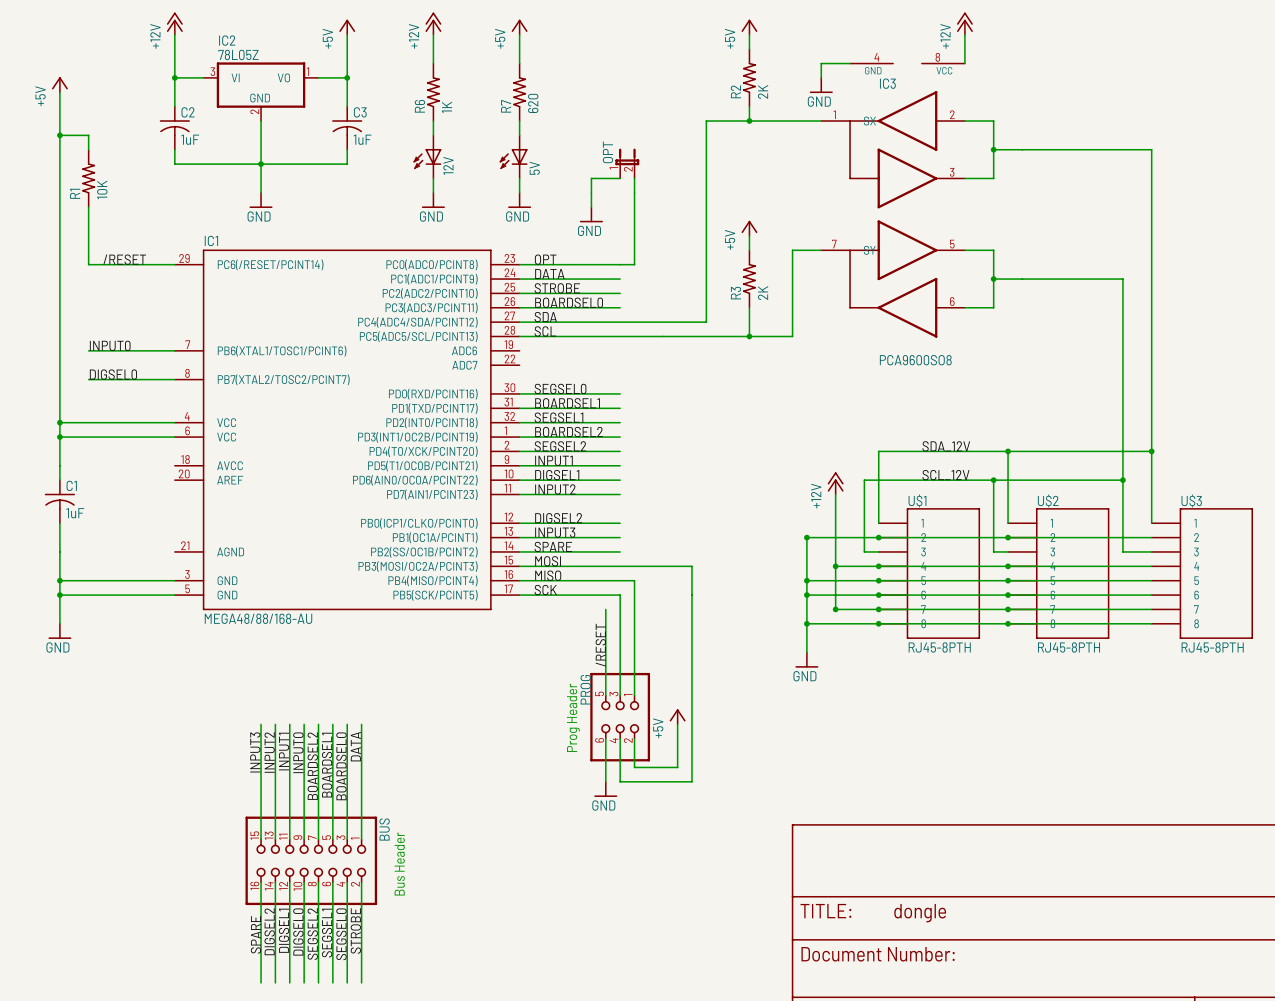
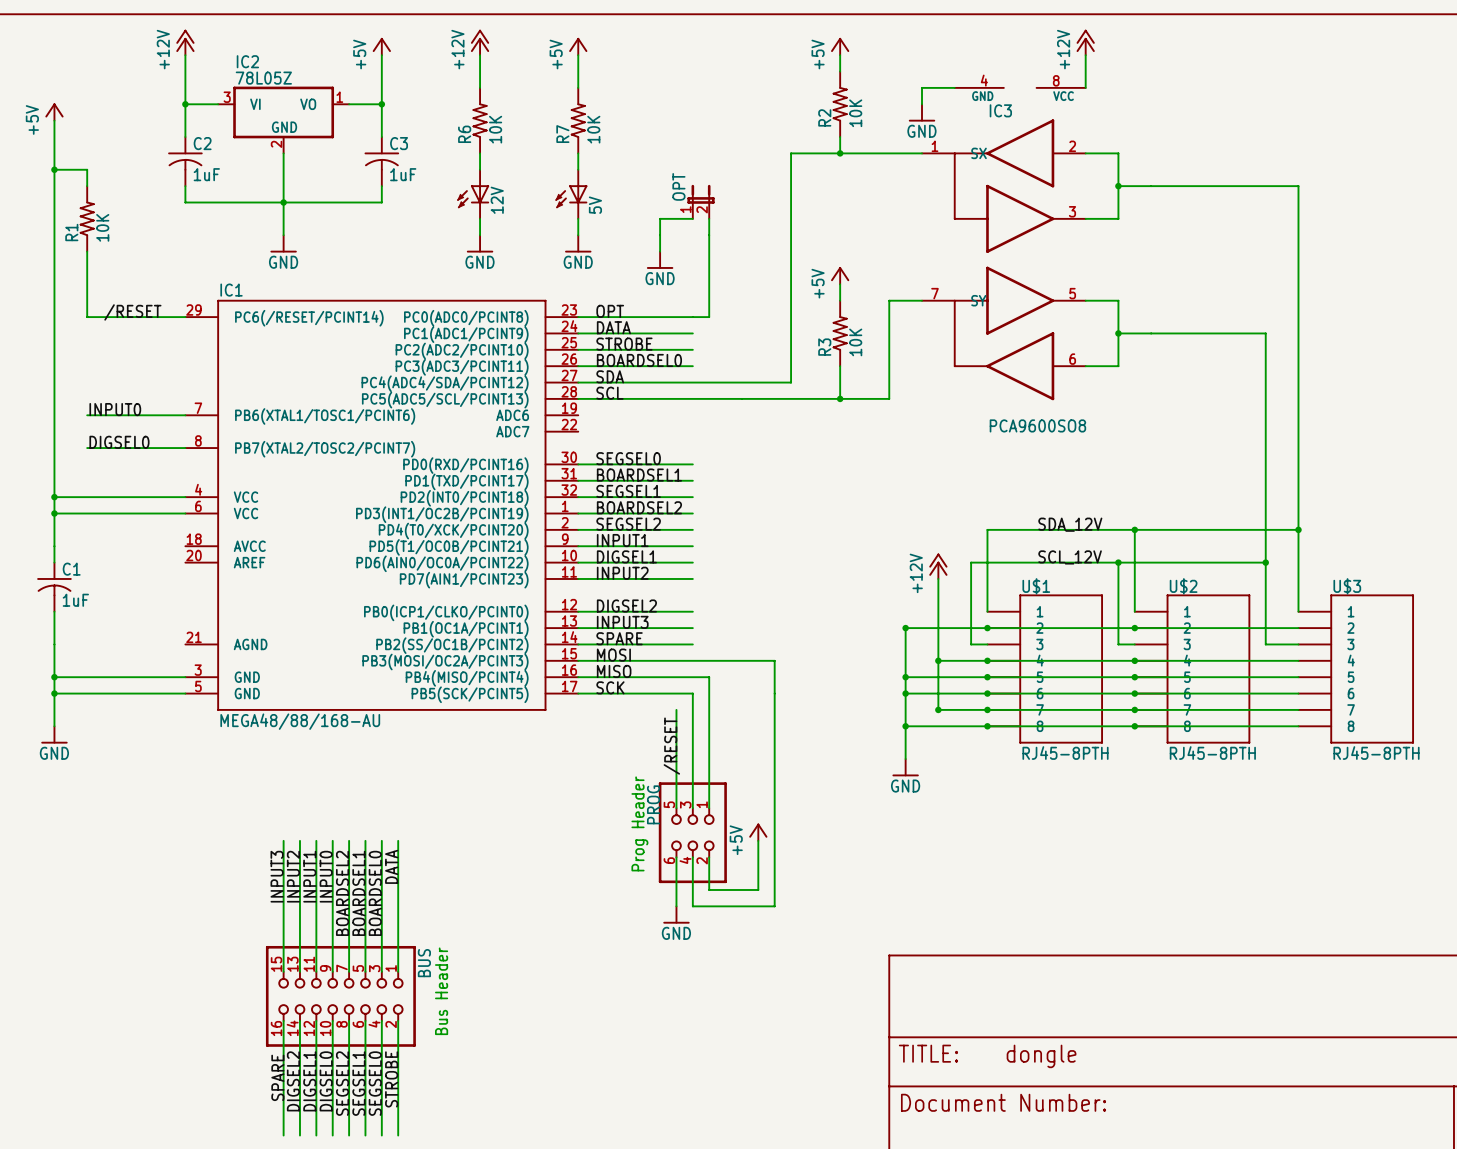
R2 value: 2K (763, 91) -> 10K (855, 113)
R7 value: 620 (533, 103) -> 10K (593, 129)
R6 value: 1K (447, 107) -> 10K (495, 129)
R3 value: 2K (763, 292) -> 10K (855, 342)

